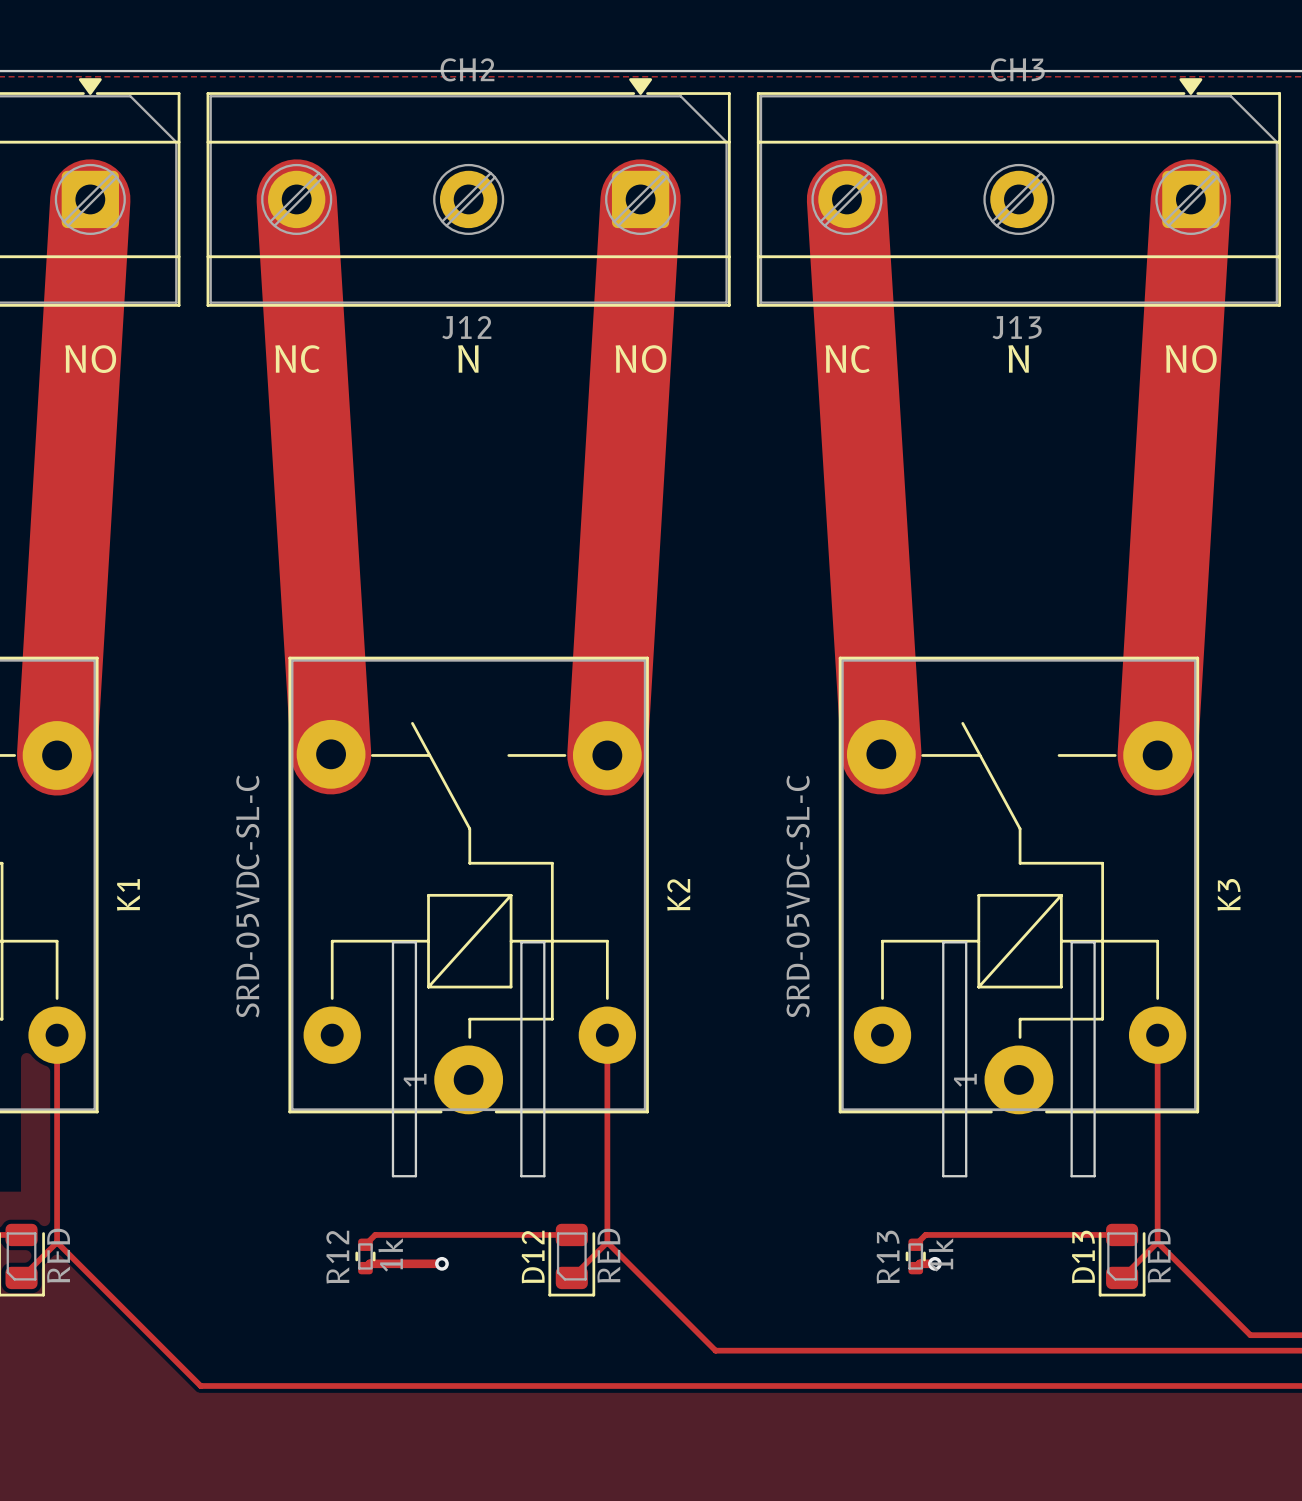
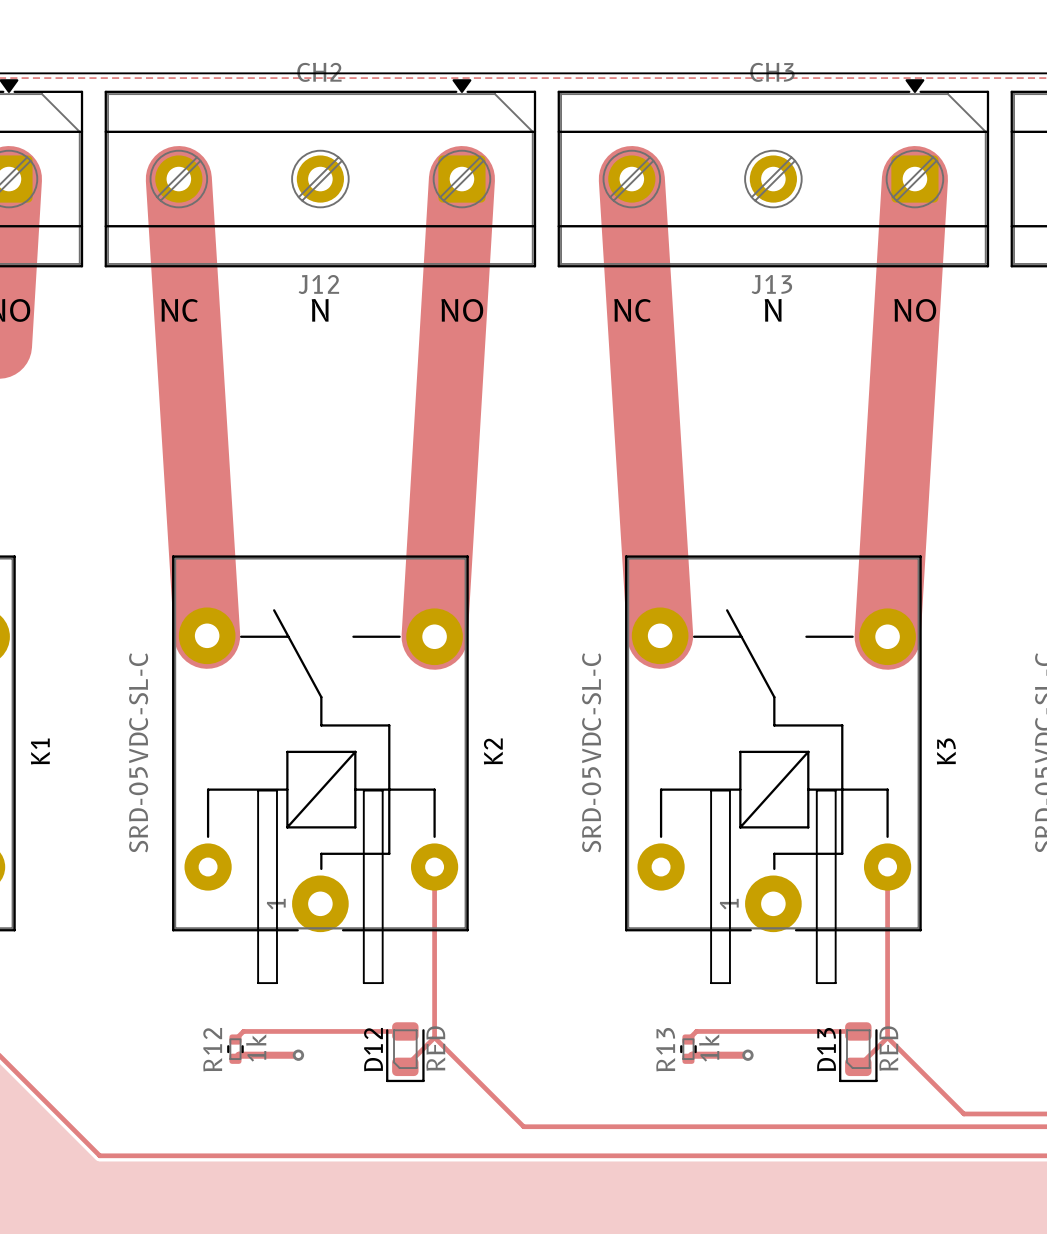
track: none -> (704, 1055) (747, 1055)
via position: (934, 1263) -> (747, 1055)

